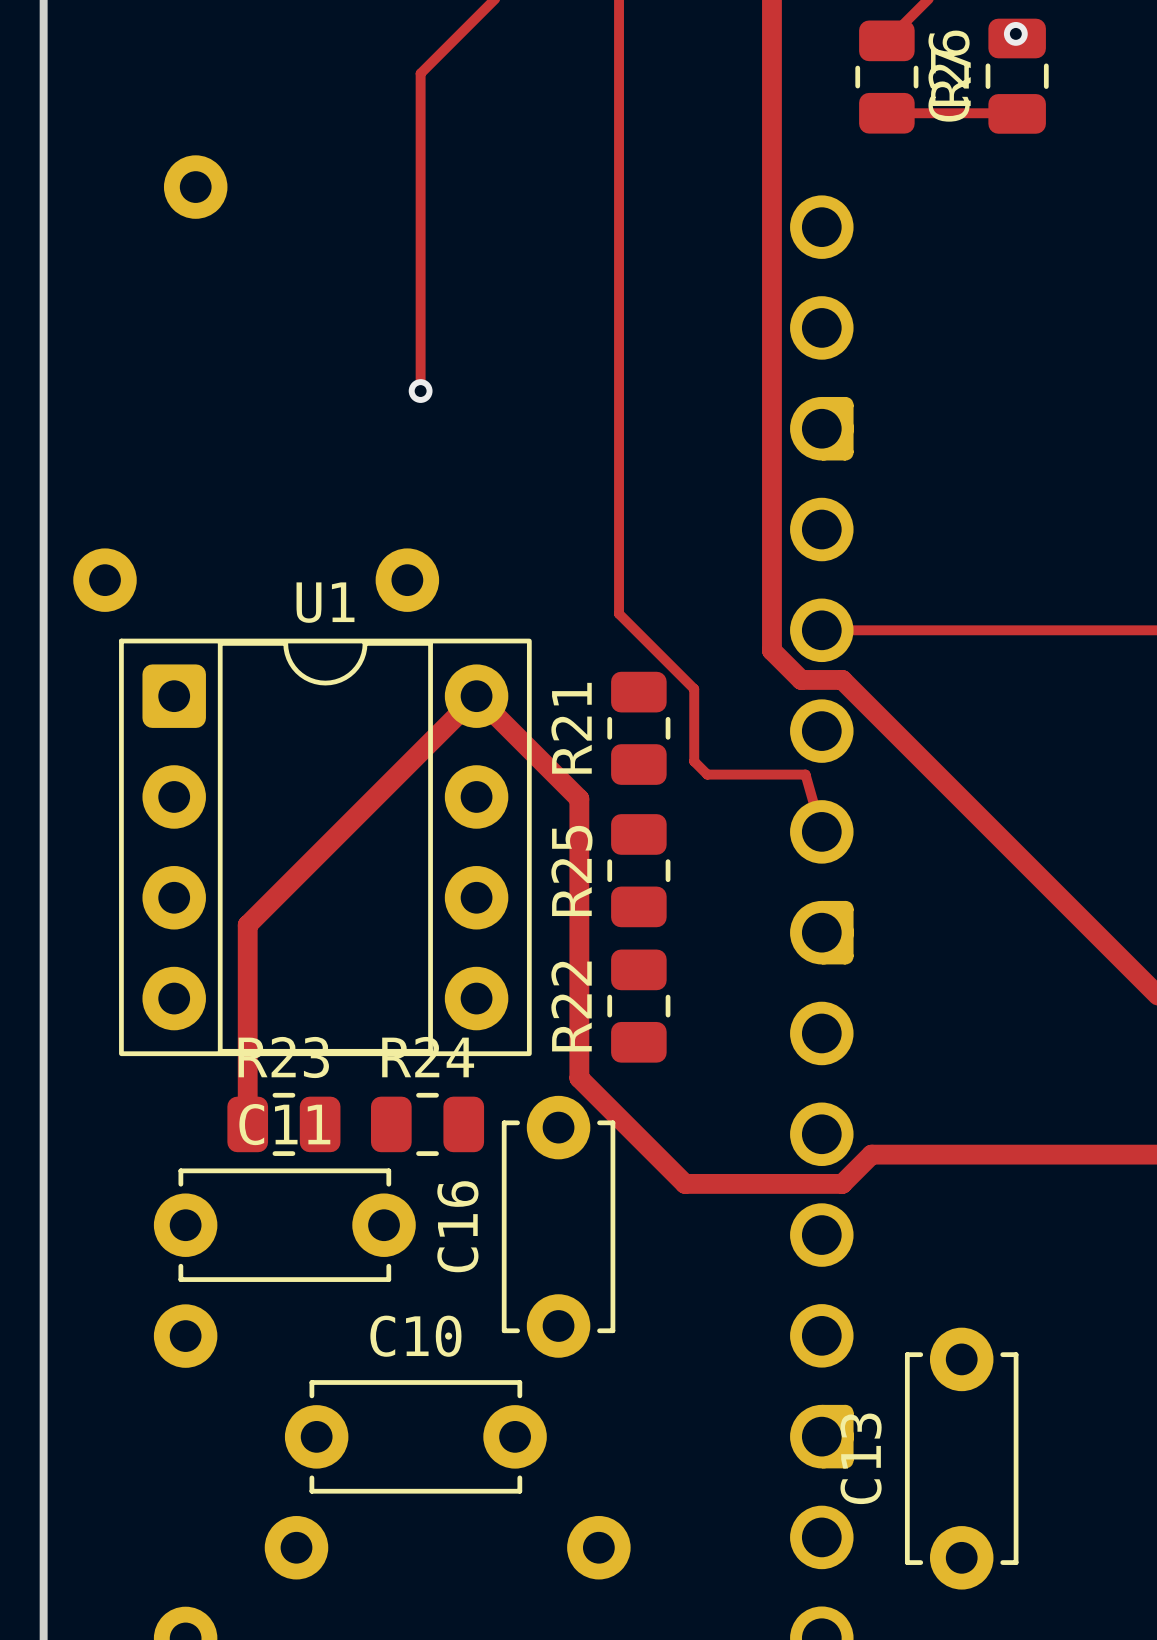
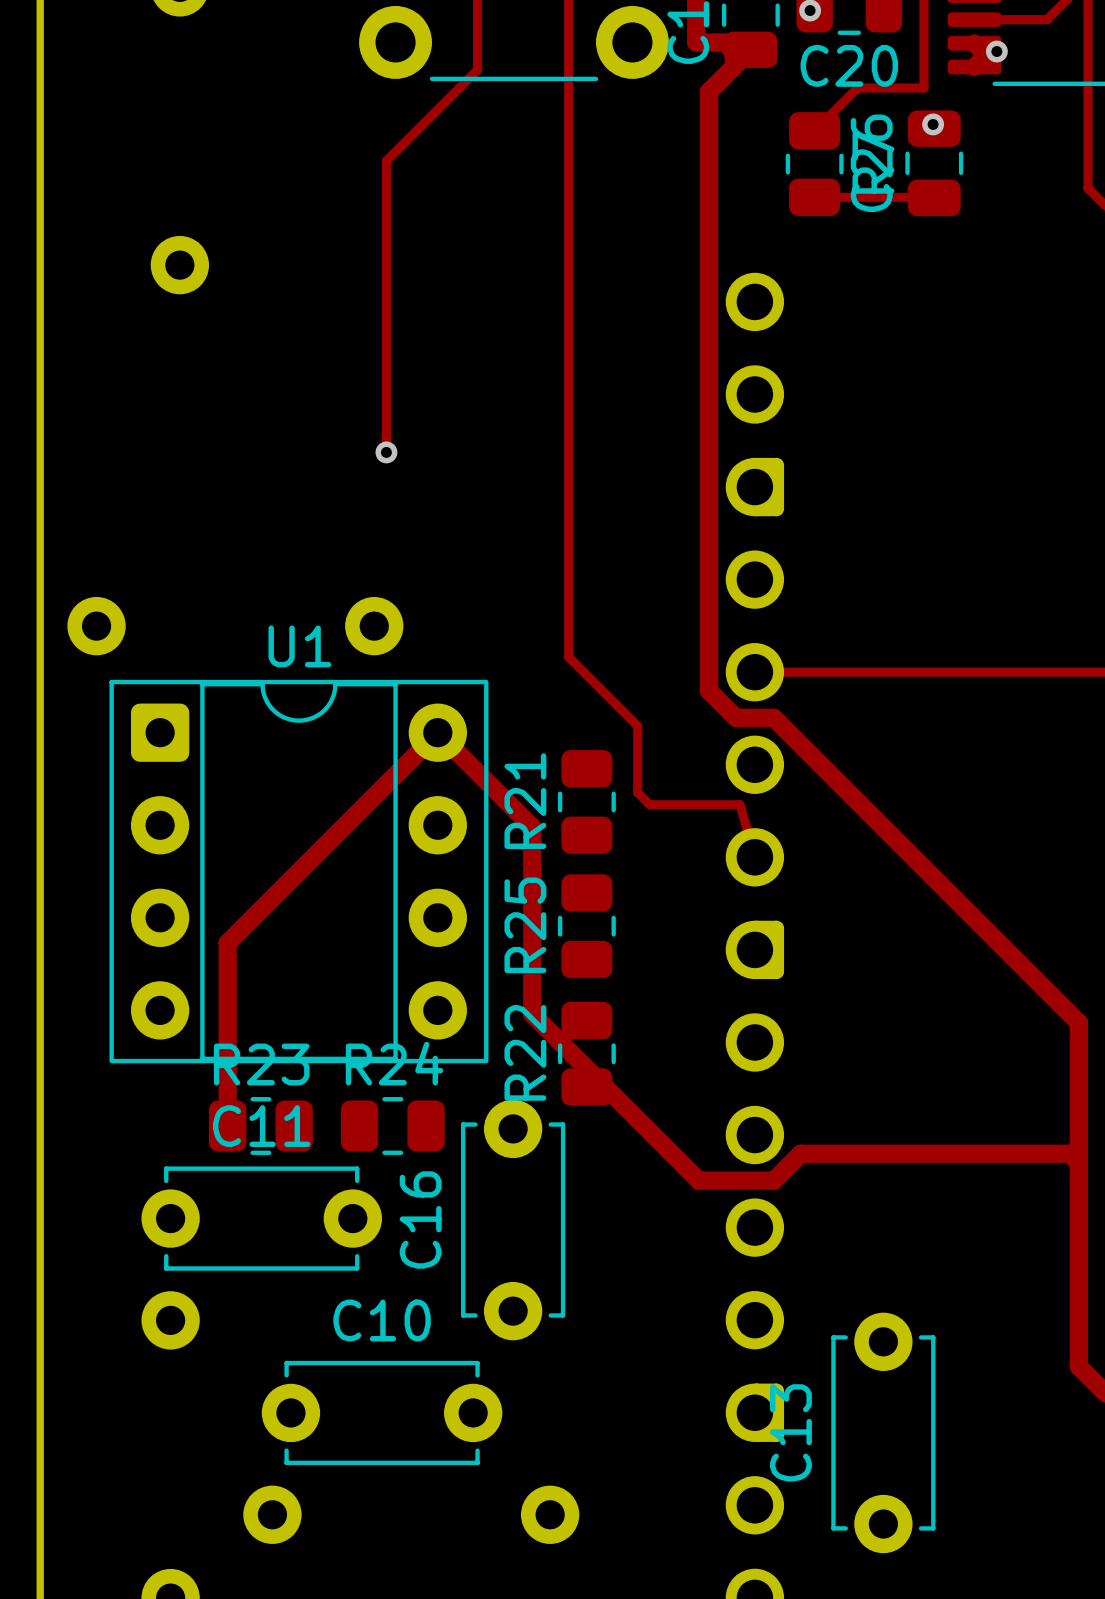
R21 position: (638, 728) -> (586, 802)
R25 position: (638, 870) -> (586, 926)
track: (579, 1002) (579, 1078) (685, 1183) (760, 1183) -> (532, 1013) (698, 1180)
R22 position: (638, 1006) -> (586, 1053)

